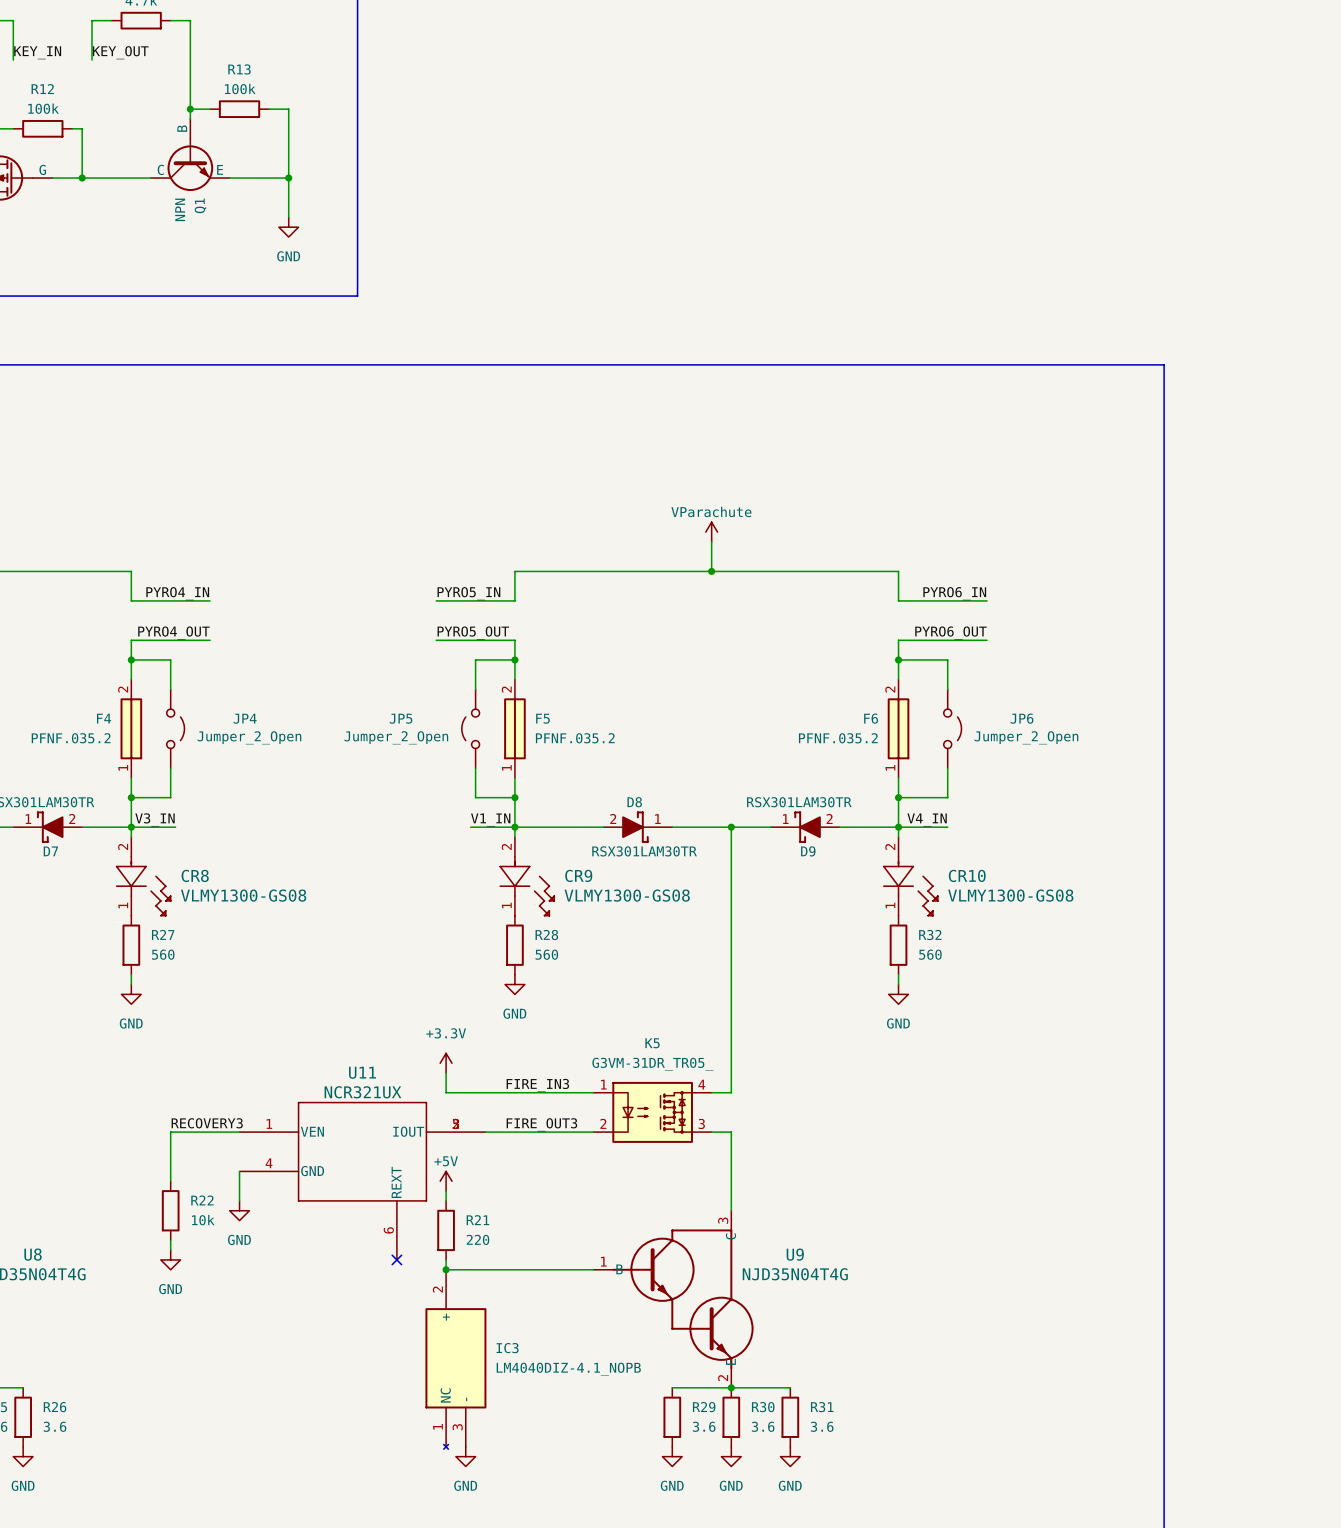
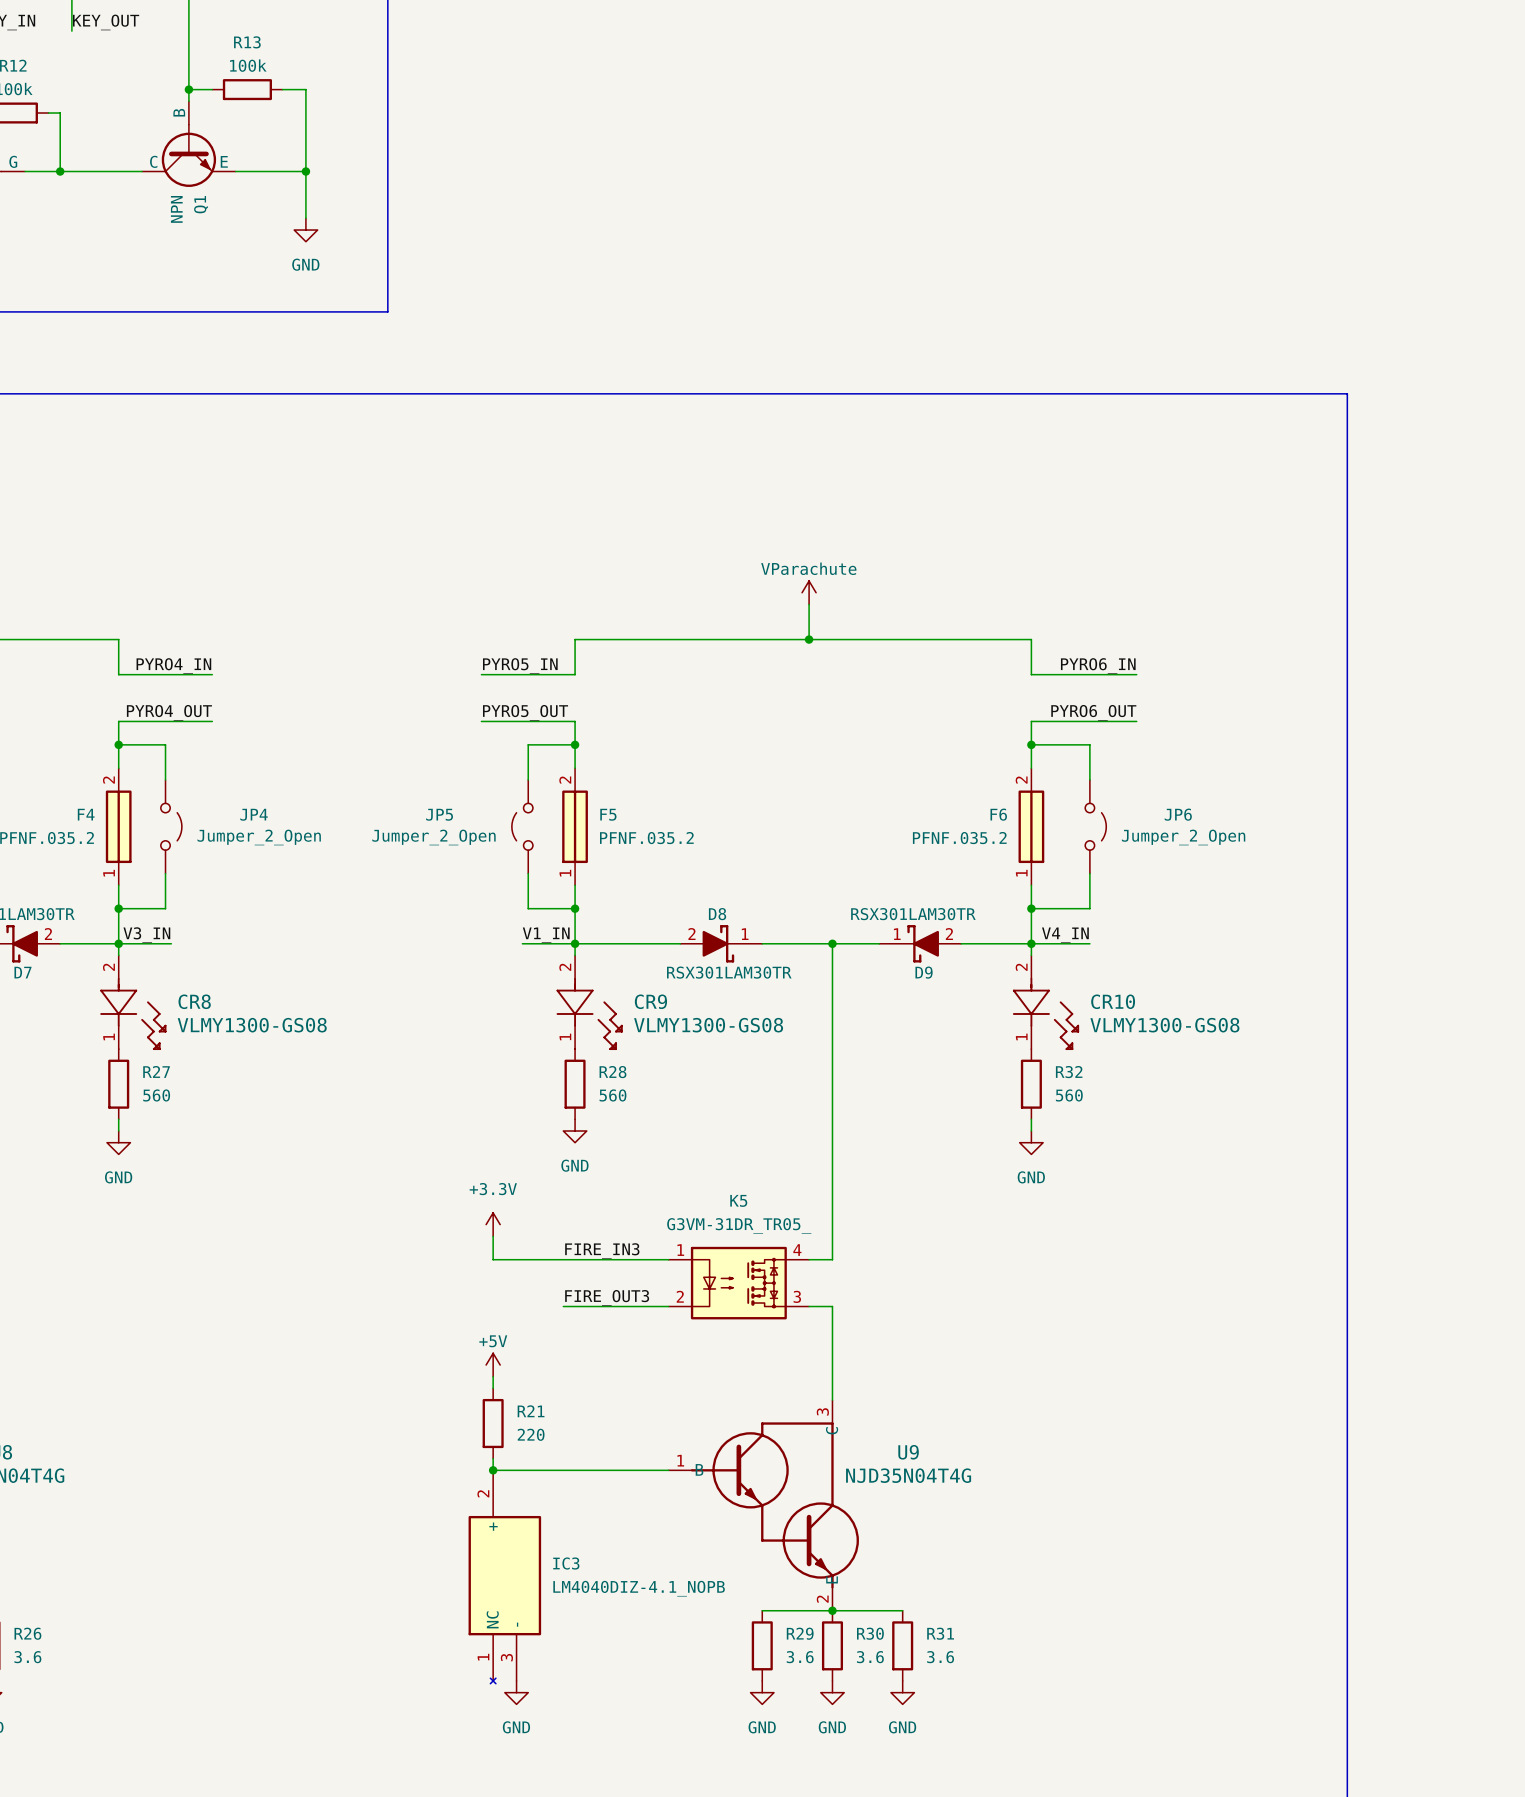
label: RECOVERY3 (207, 1123) -> none
wire: (239, 1132) (170, 1132) (170, 1181) -> none
wire: (485, 1132) (505, 1132) -> none
wire: (239, 1171) (239, 1200) -> none
U11: NCR321UX (362, 1181) -> none
R22: 10k (170, 1210) -> none
power symbol: GND (239, 1210) -> none
wire: (170, 1240) (170, 1250) -> none
power symbol: GND (170, 1259) -> none
no-connect mark: (396, 1259) -> none

